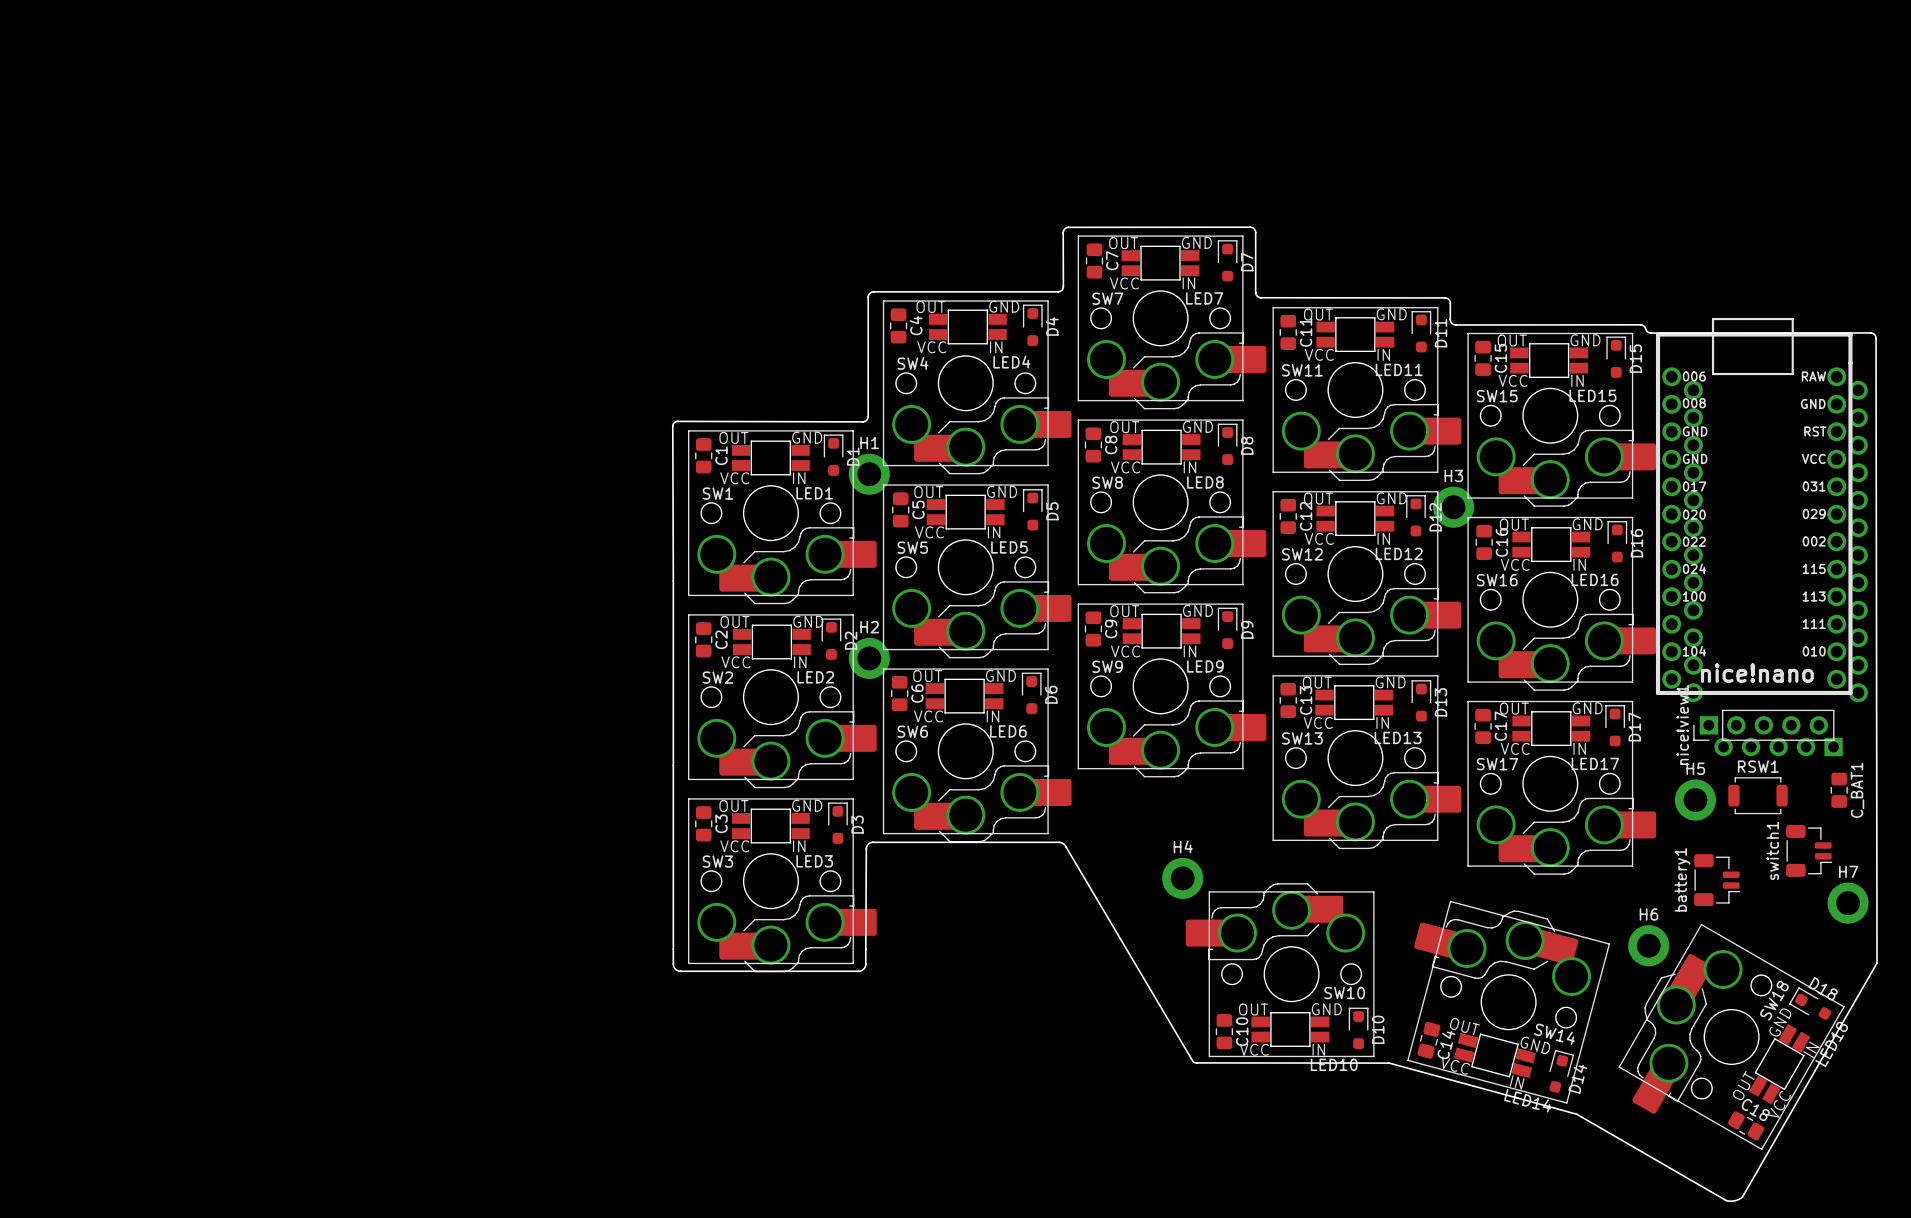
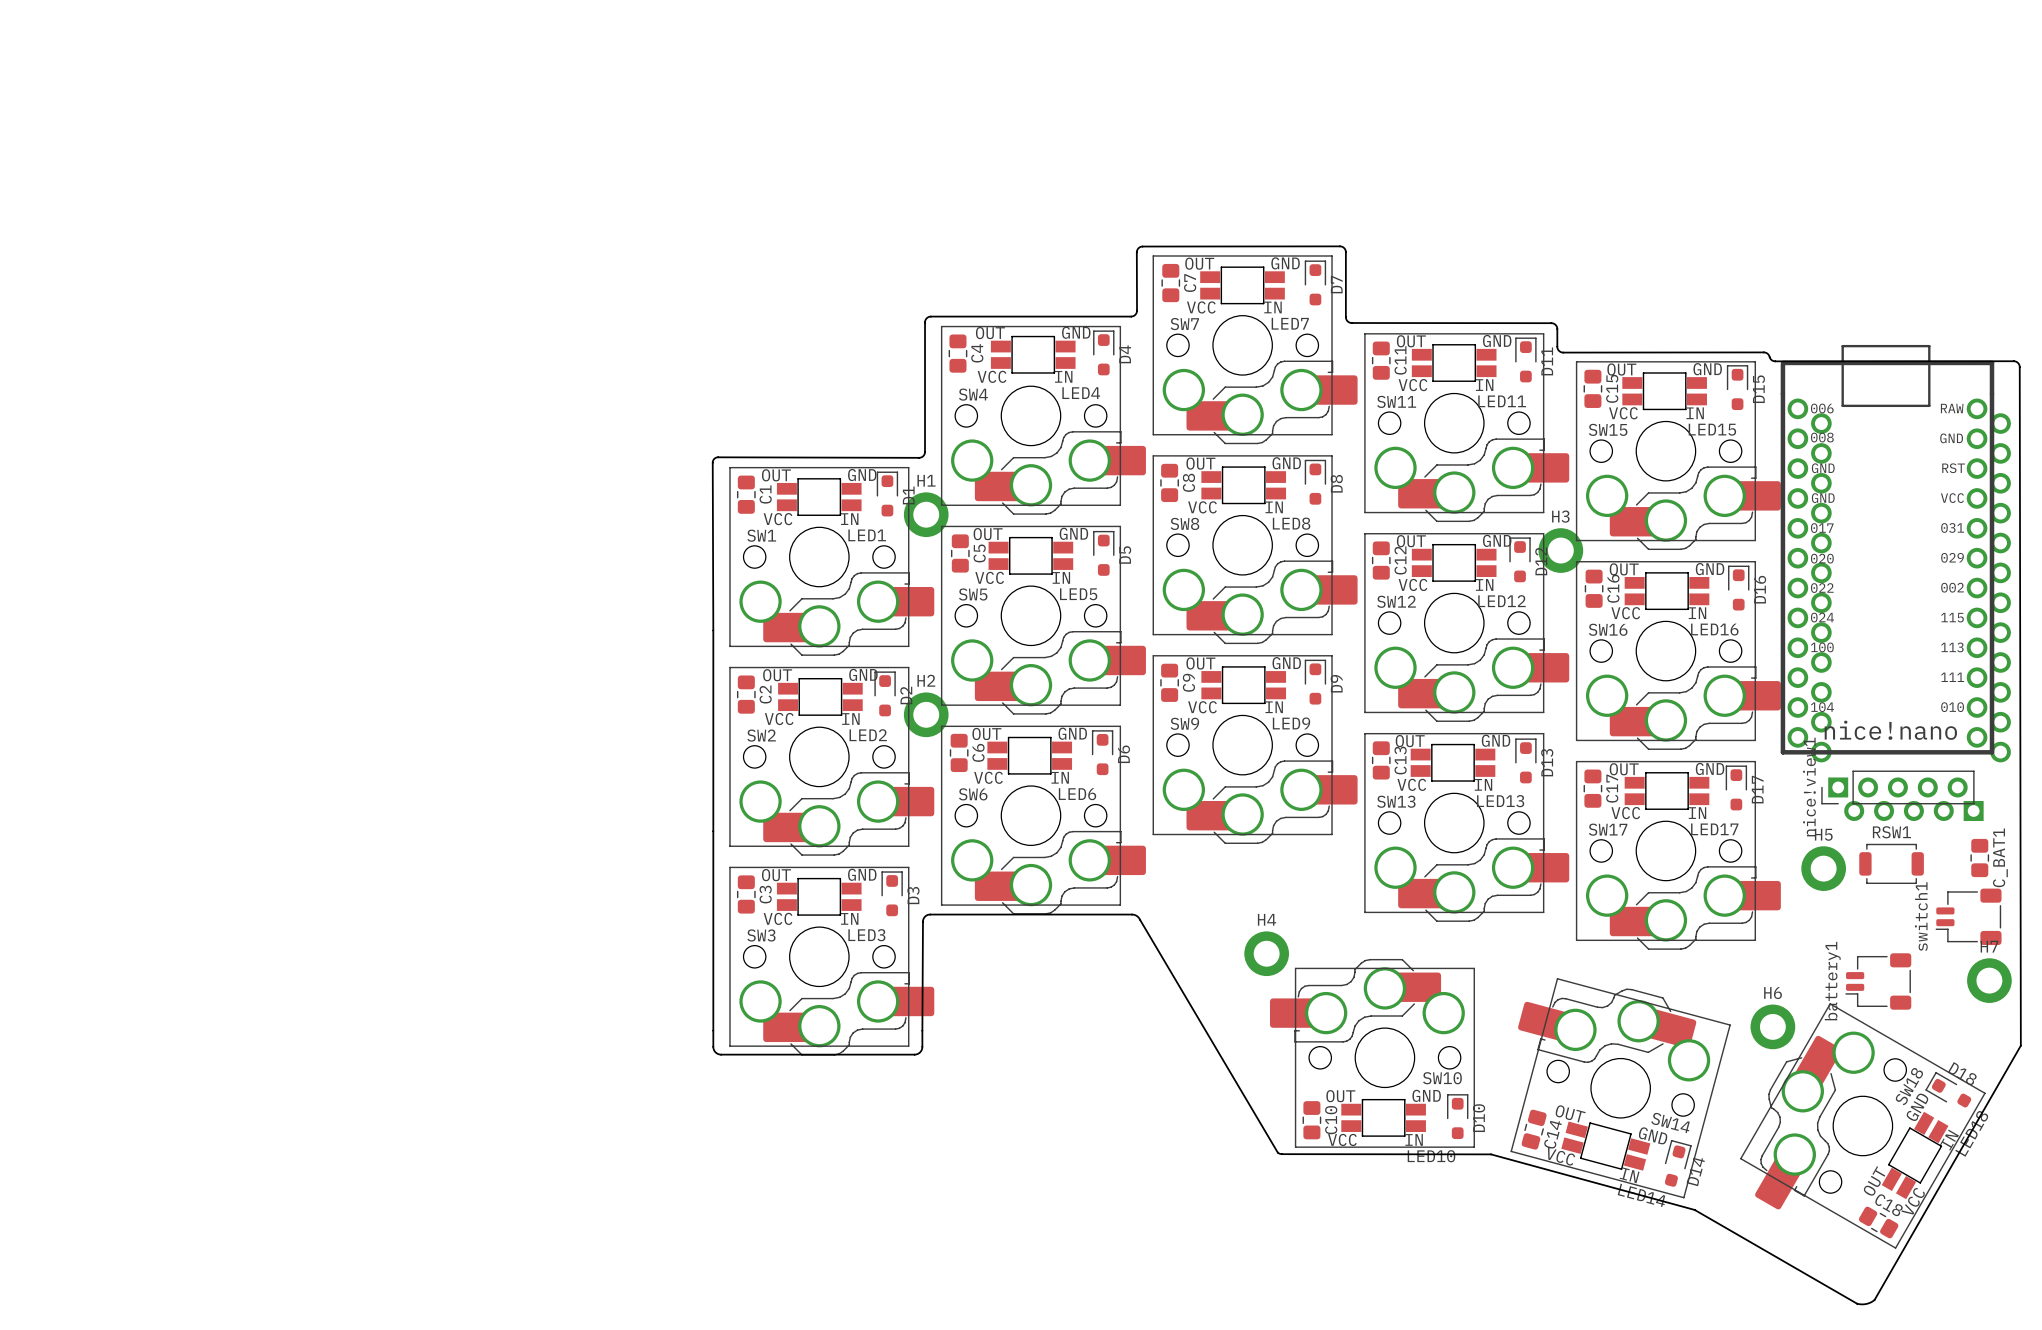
switch1 footprint: [1786, 824, 1833, 877] -> [1935, 888, 2002, 946]
battery1 footprint: [1694, 854, 1741, 907] -> [1845, 953, 1912, 1010]

